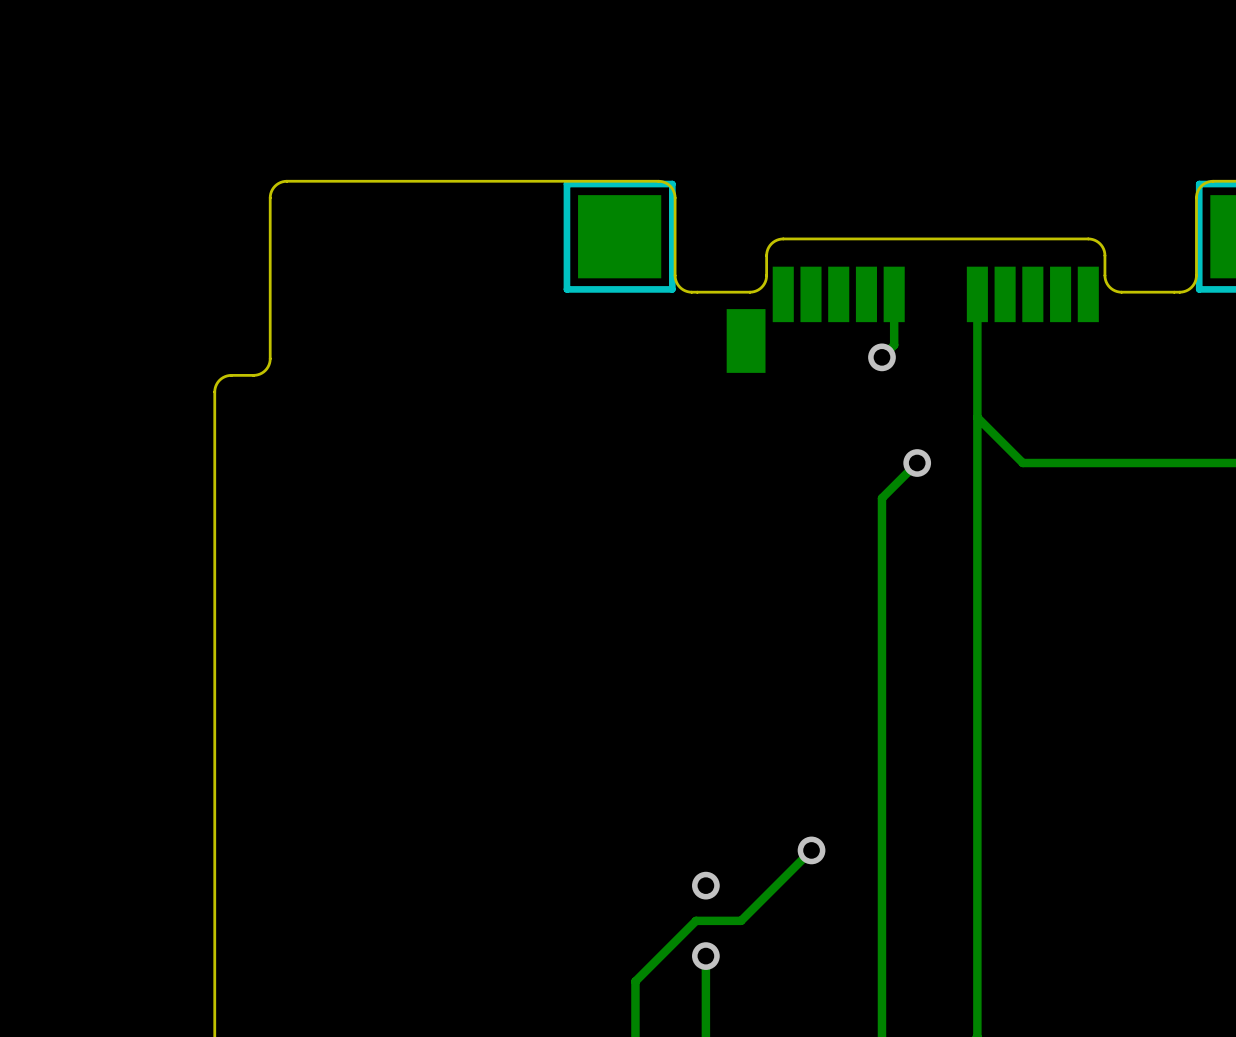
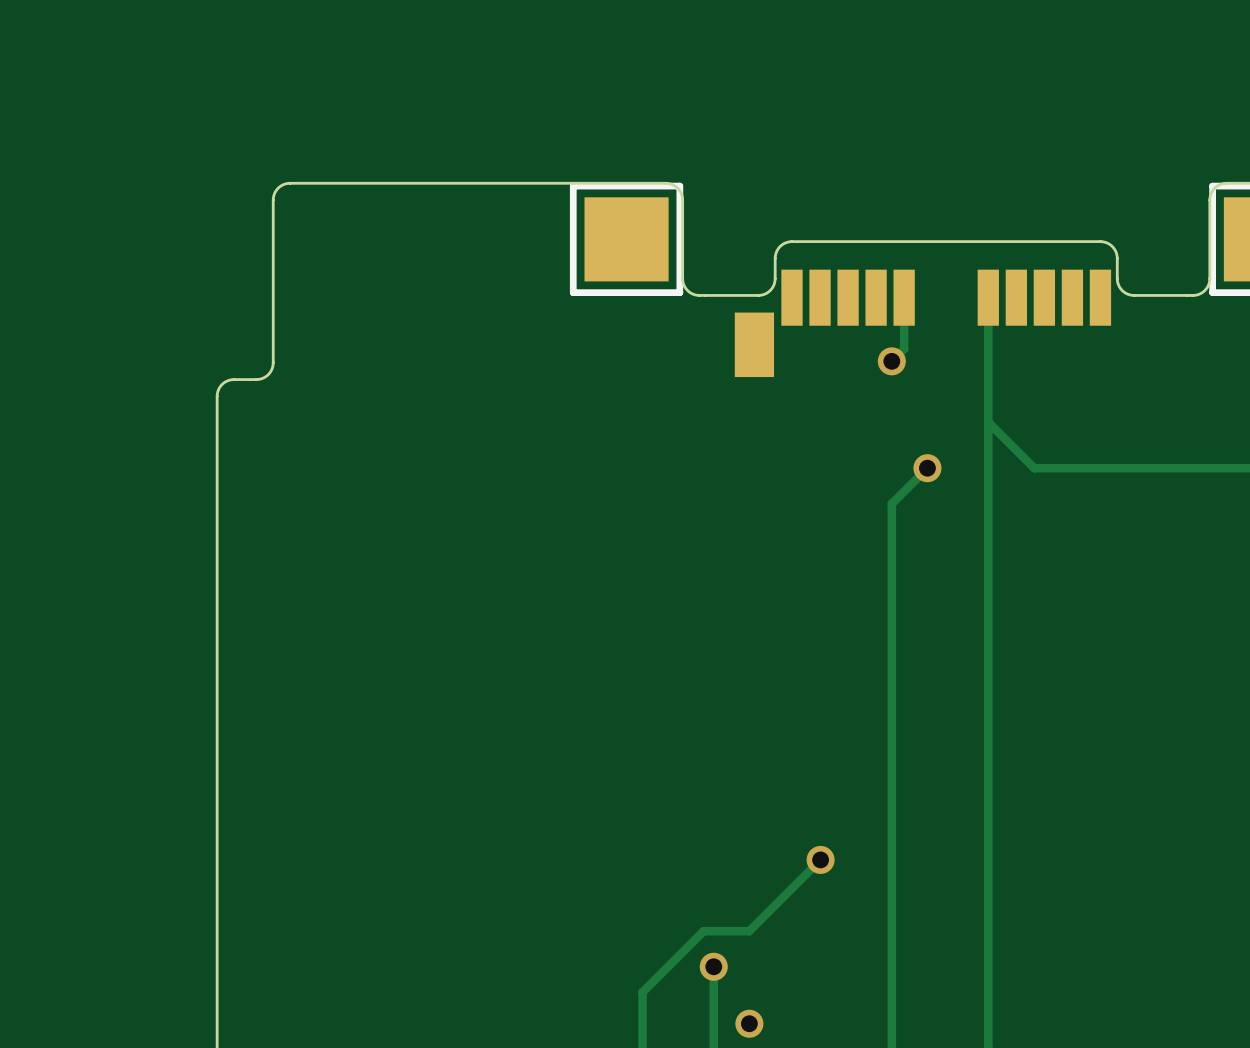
via: (705, 885) -> none
via: none -> (749, 1023)

